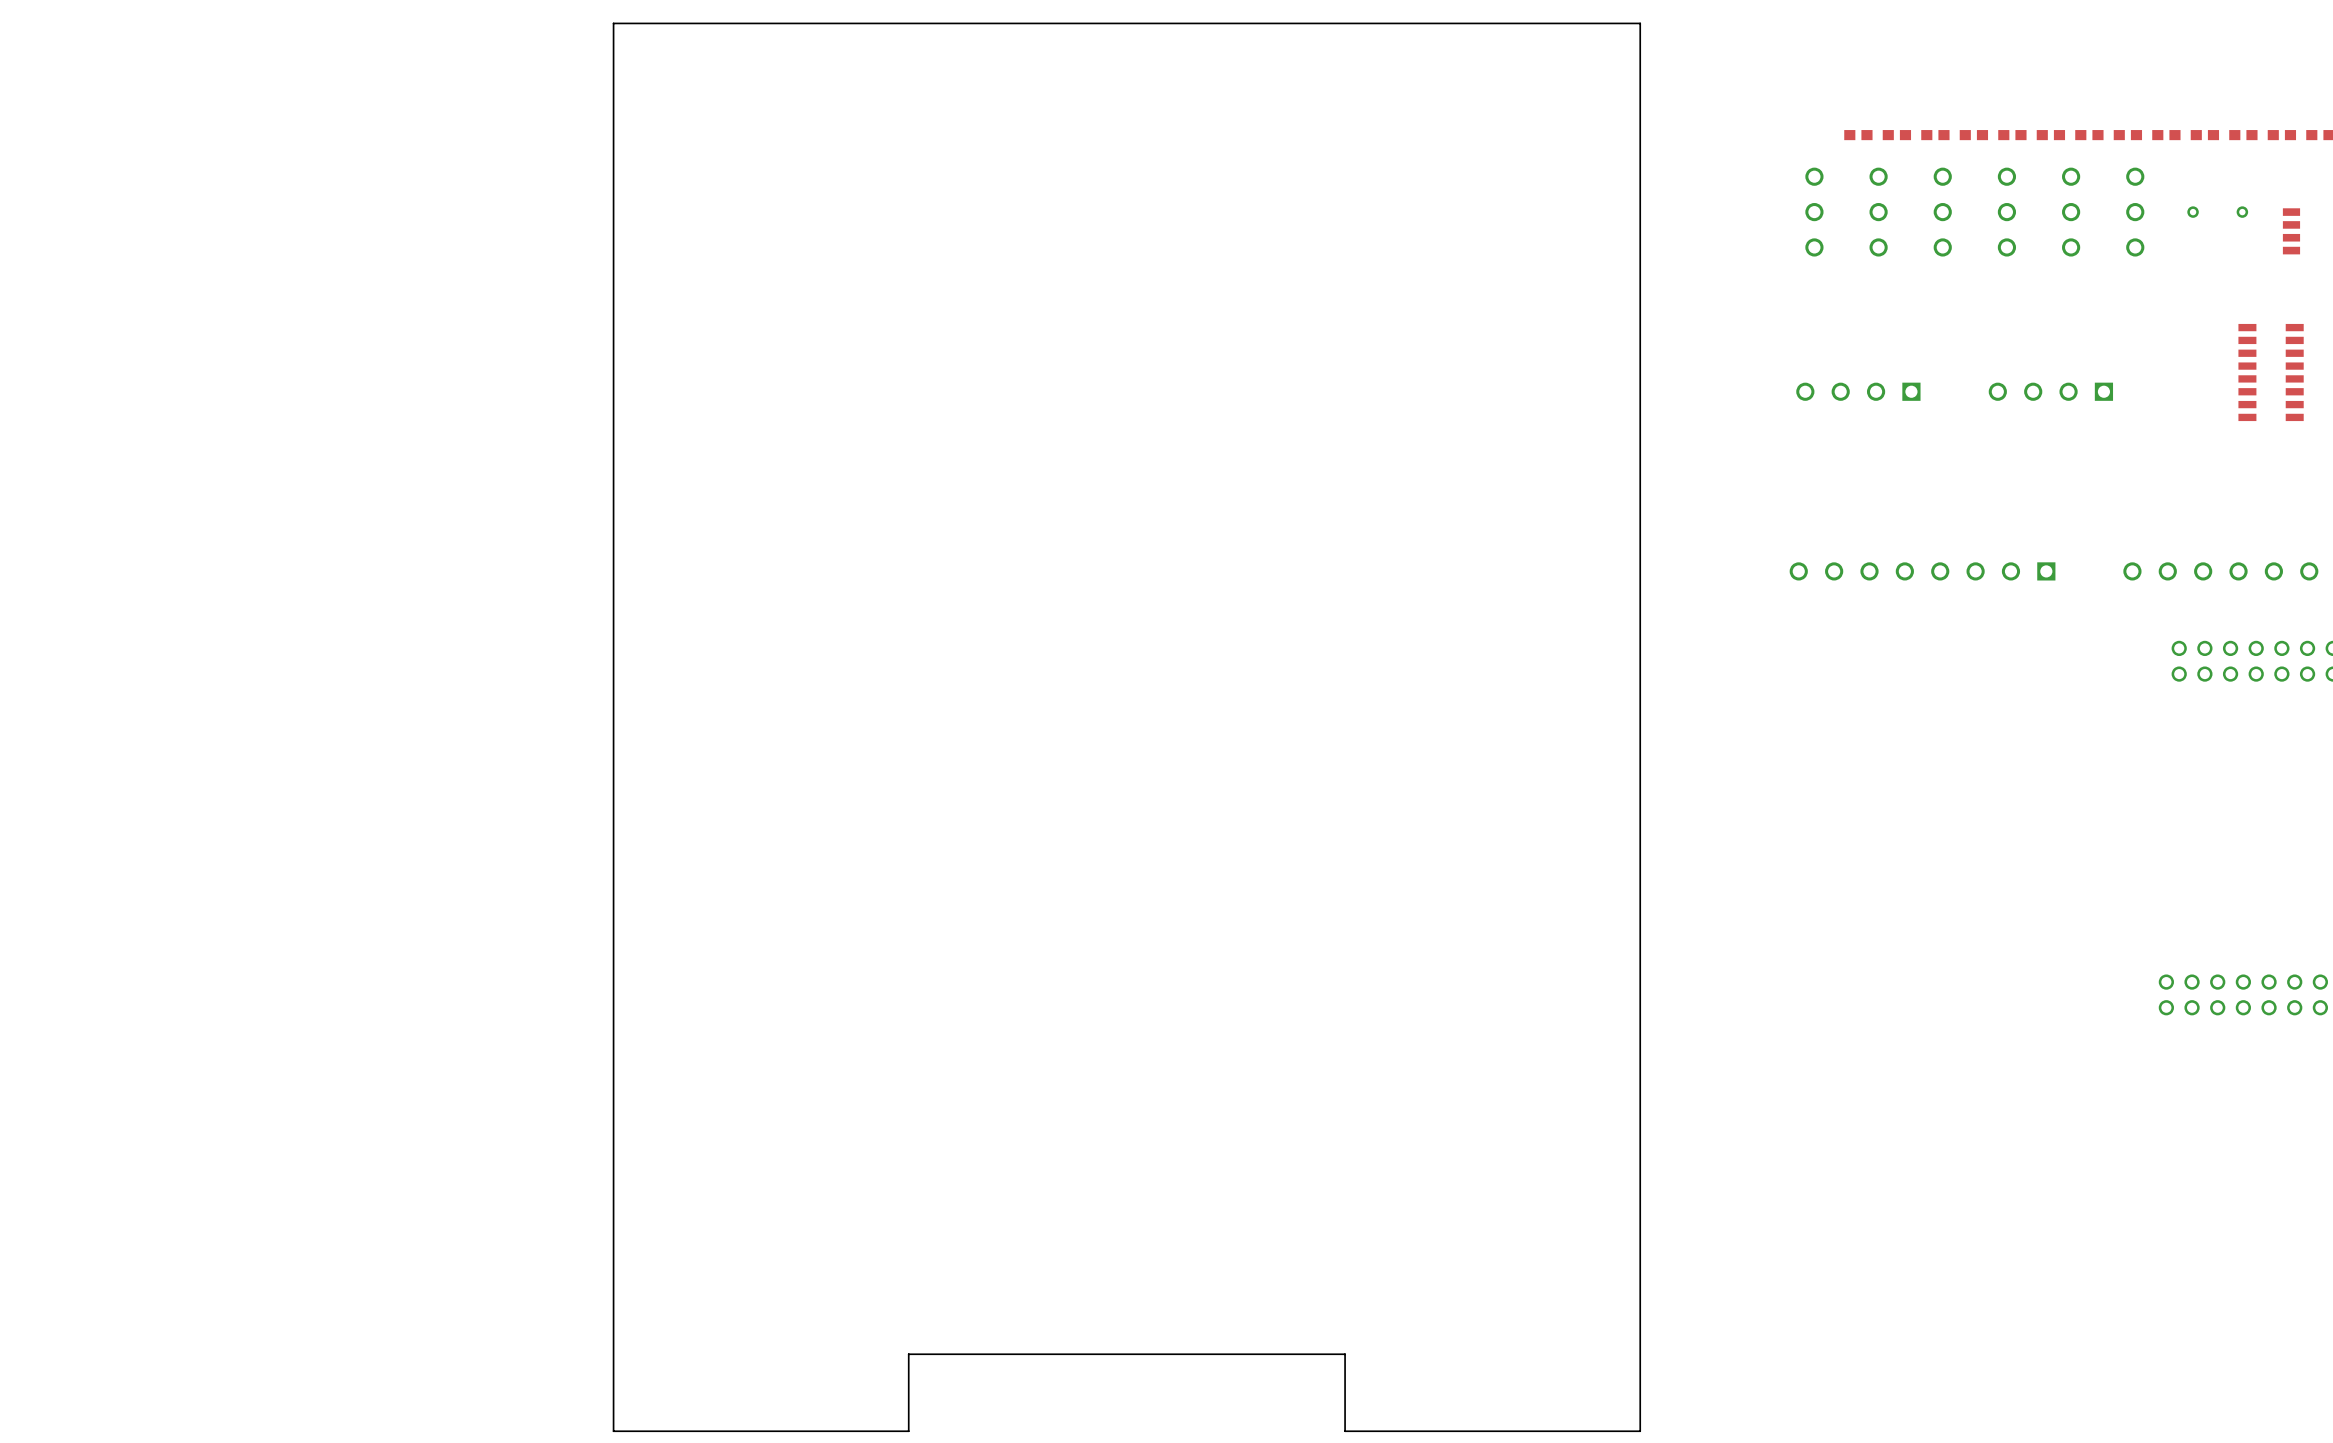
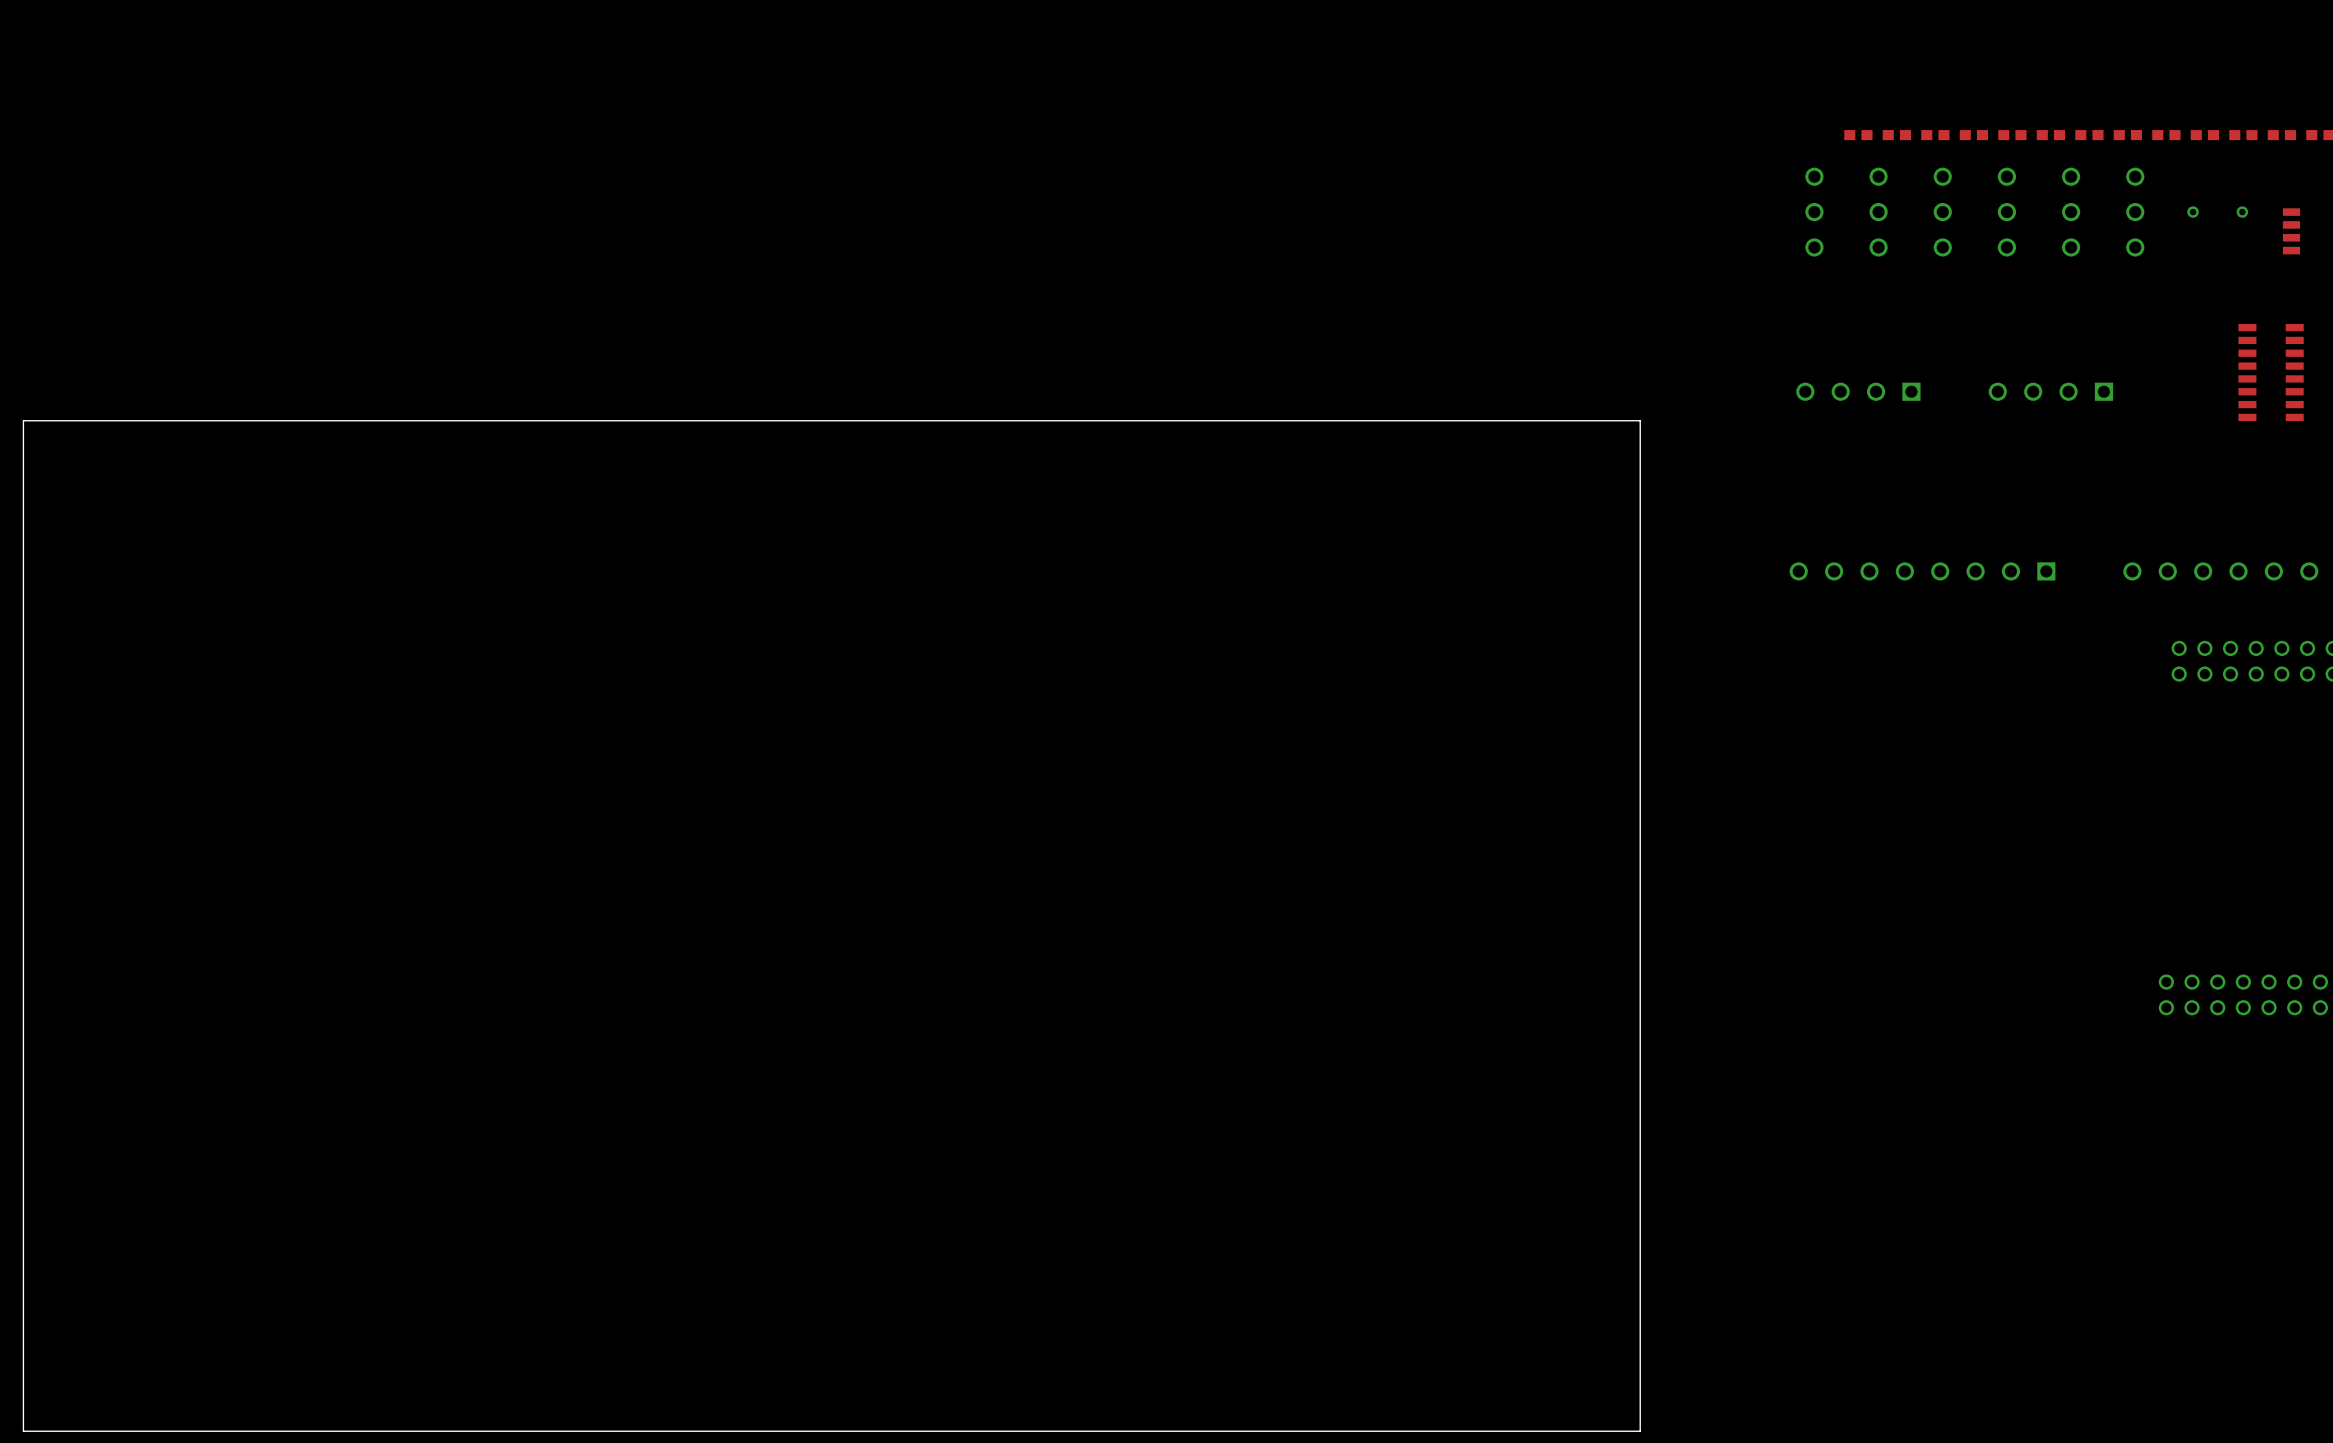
board edge: (1640, 420) (1640, 23) (613, 23) (613, 1431) -> (1640, 420) (23, 420) (23, 1431) (613, 1431)
board edge: (1345, 1431) (1345, 1354) (908, 1354) (908, 1431) -> (1345, 1431) (908, 1431)

